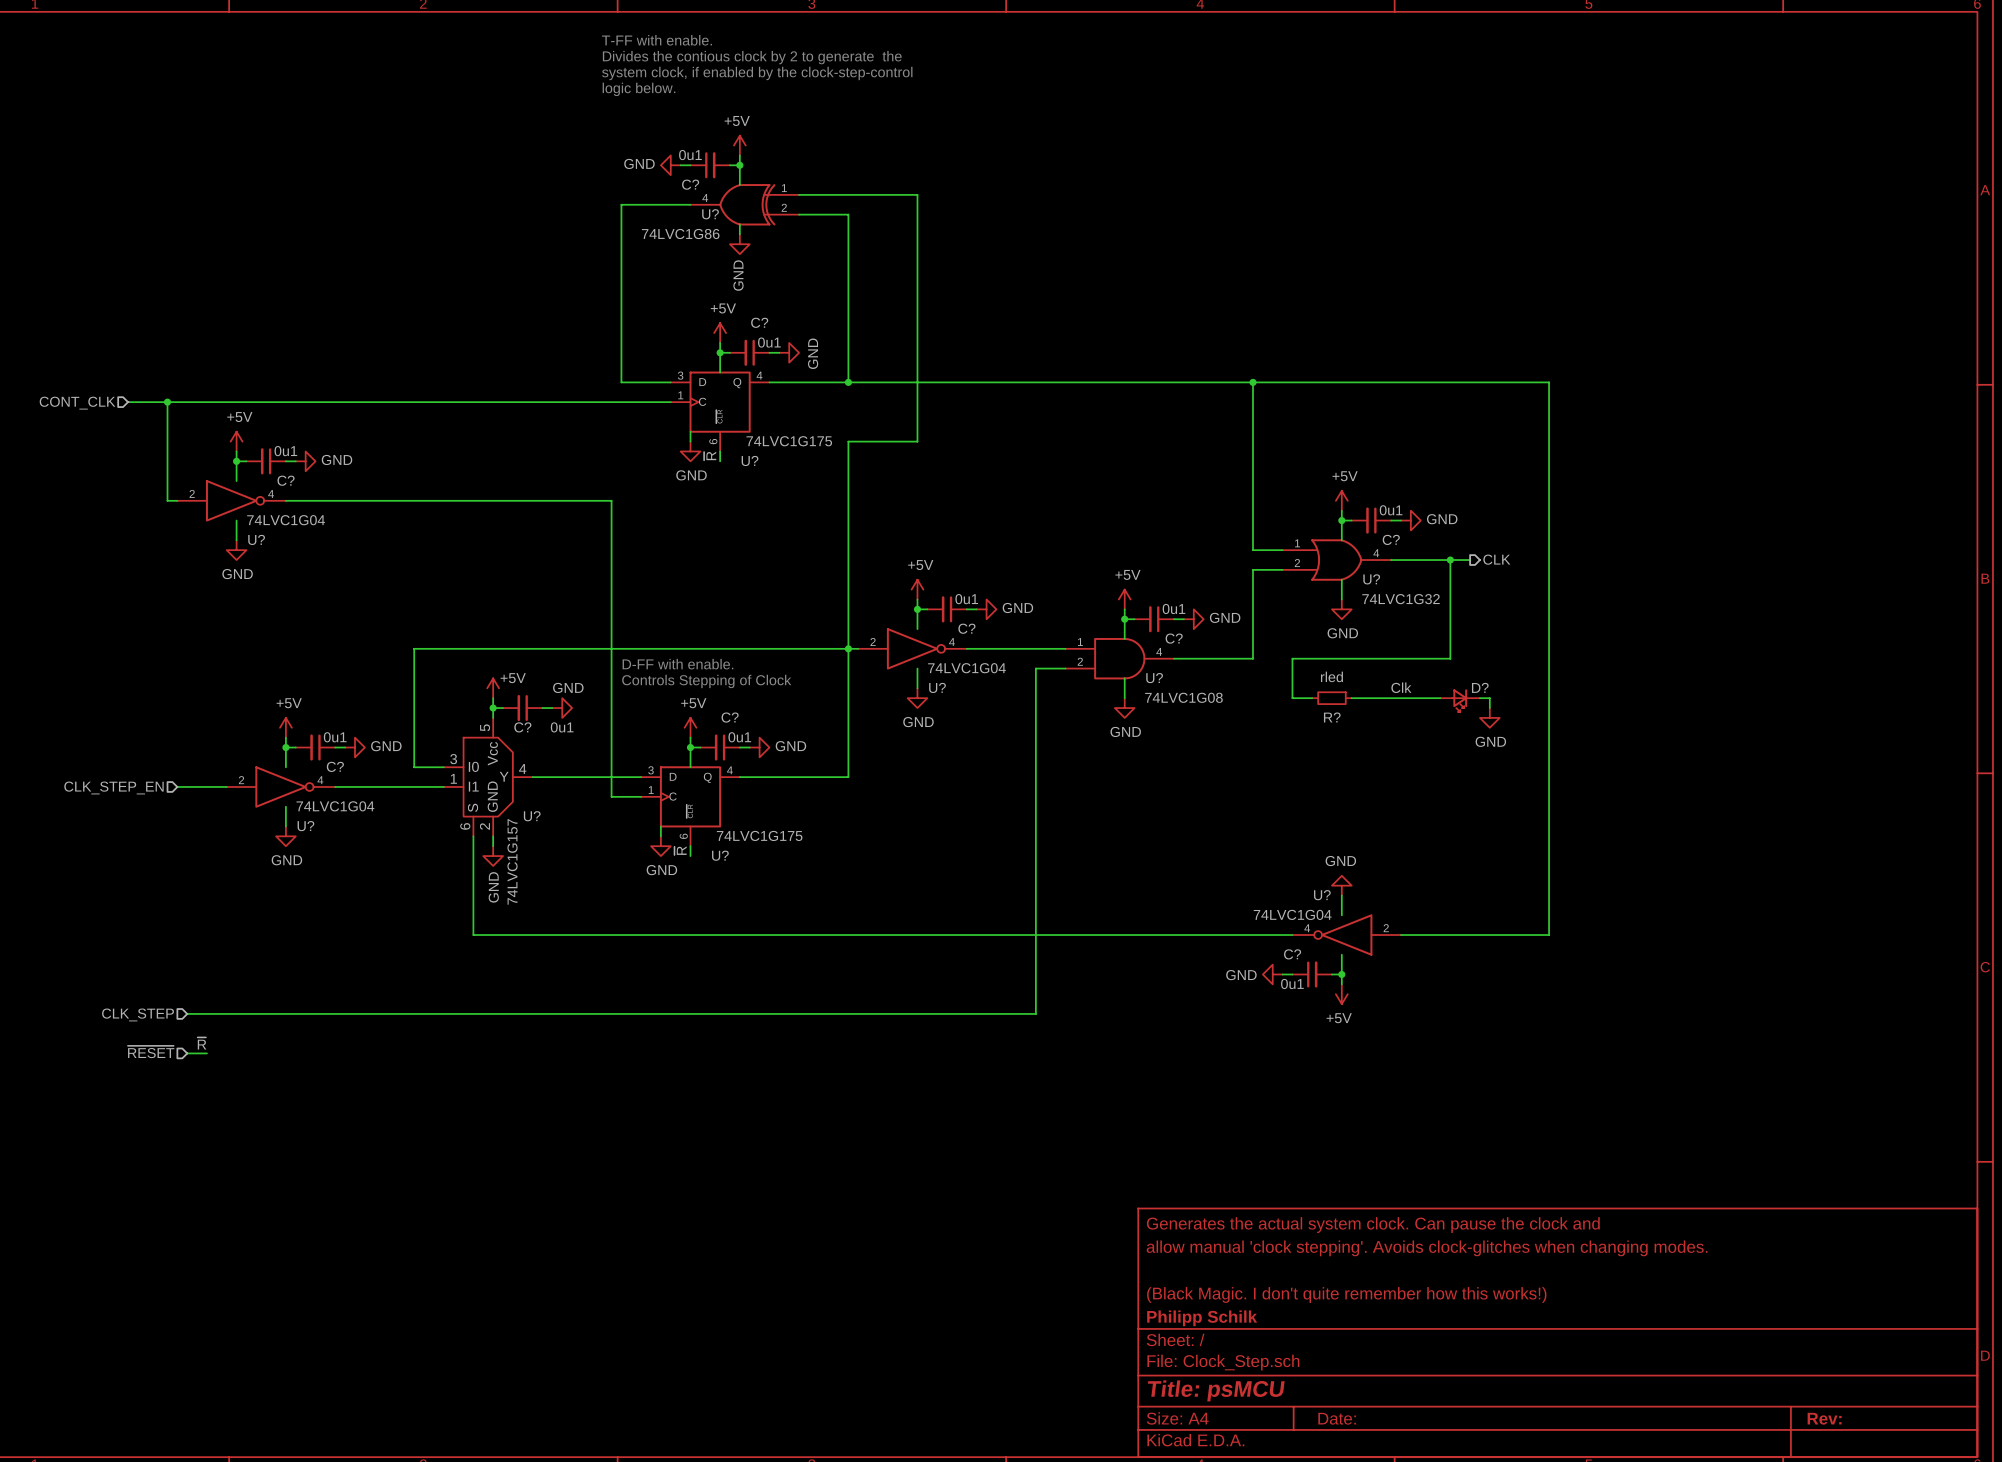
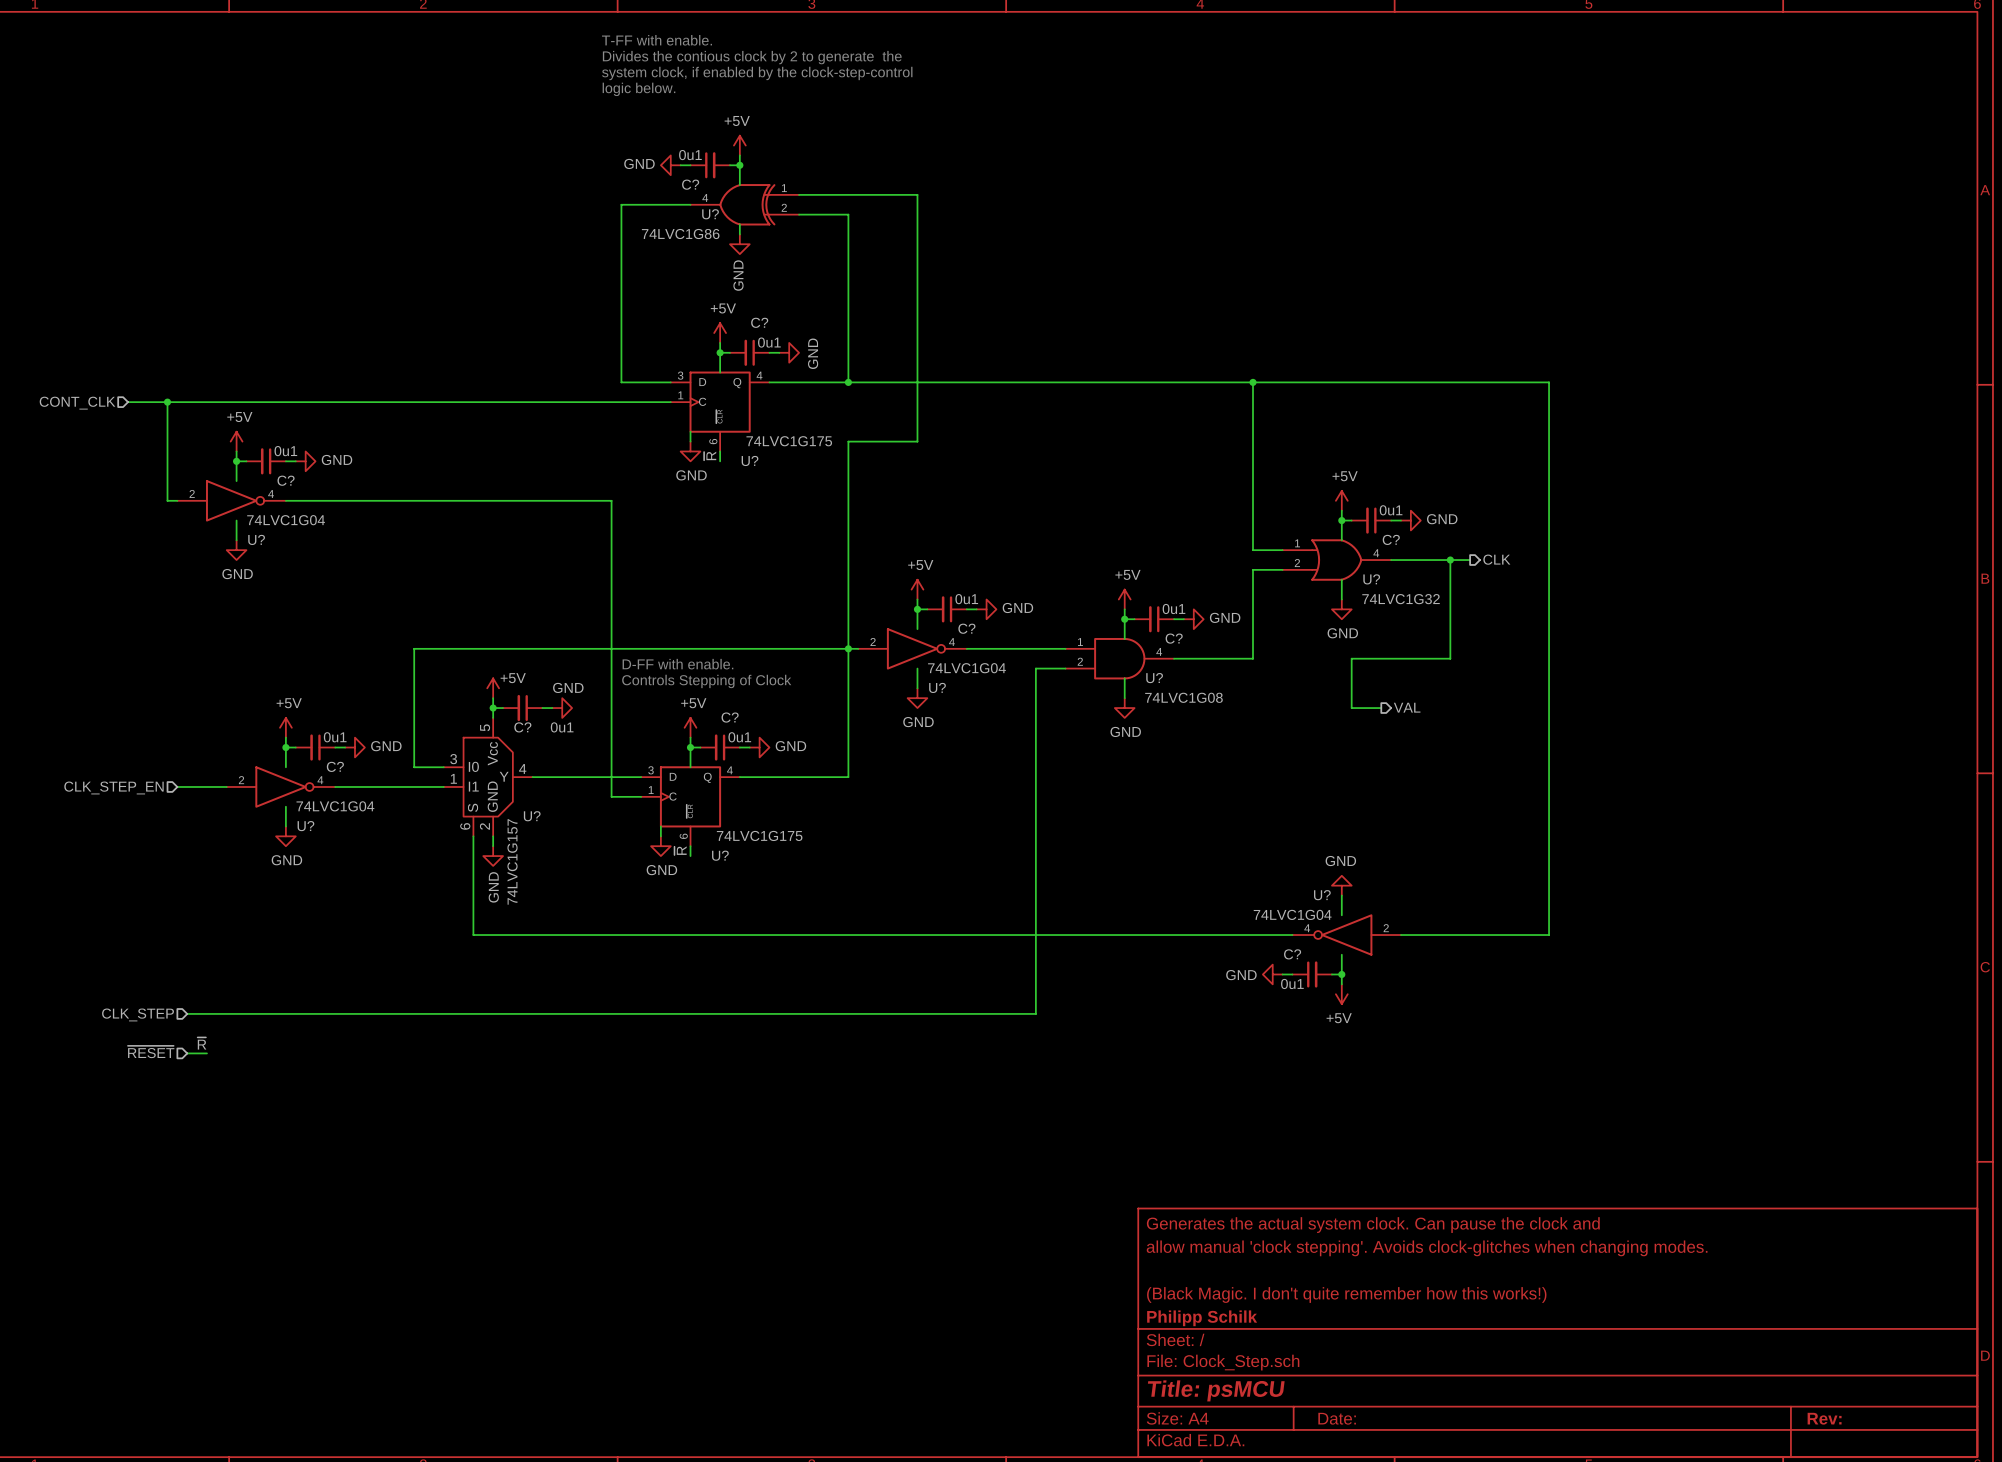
wire: (1351, 658) (1292, 658) (1292, 698) (1312, 698) -> (1351, 658) (1351, 708) (1381, 708)
R?: rled (1331, 698) -> none
wire: (1351, 698) (1440, 698) -> none
wire: (1479, 698) (1489, 698) (1489, 708) -> none
D?: Clk (1460, 700) -> none
sheet pin: none -> VAL (1407, 707)
power symbol: GND (1489, 717) -> none

